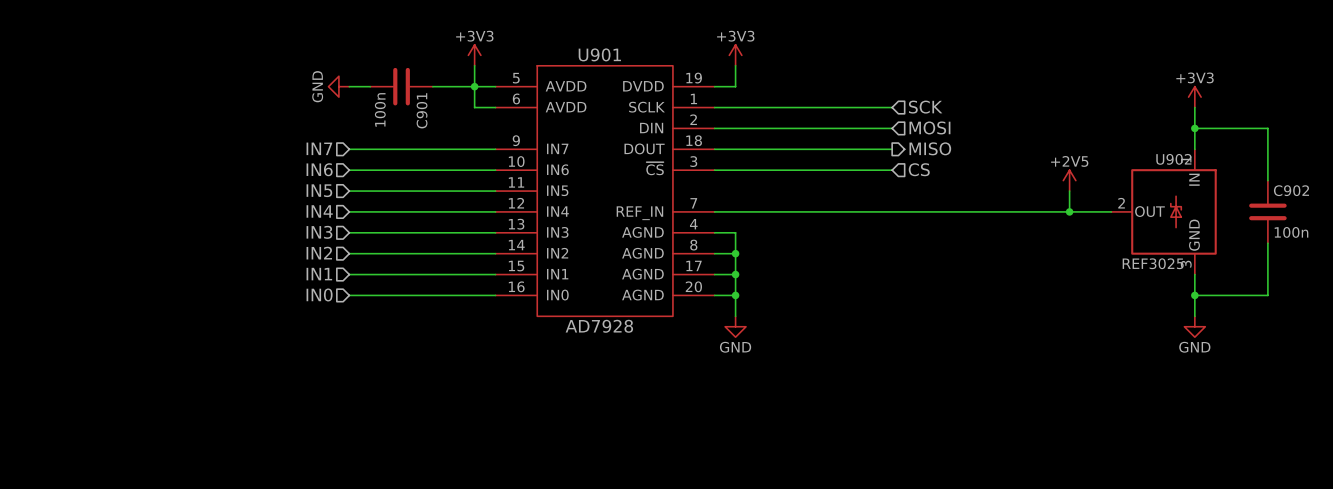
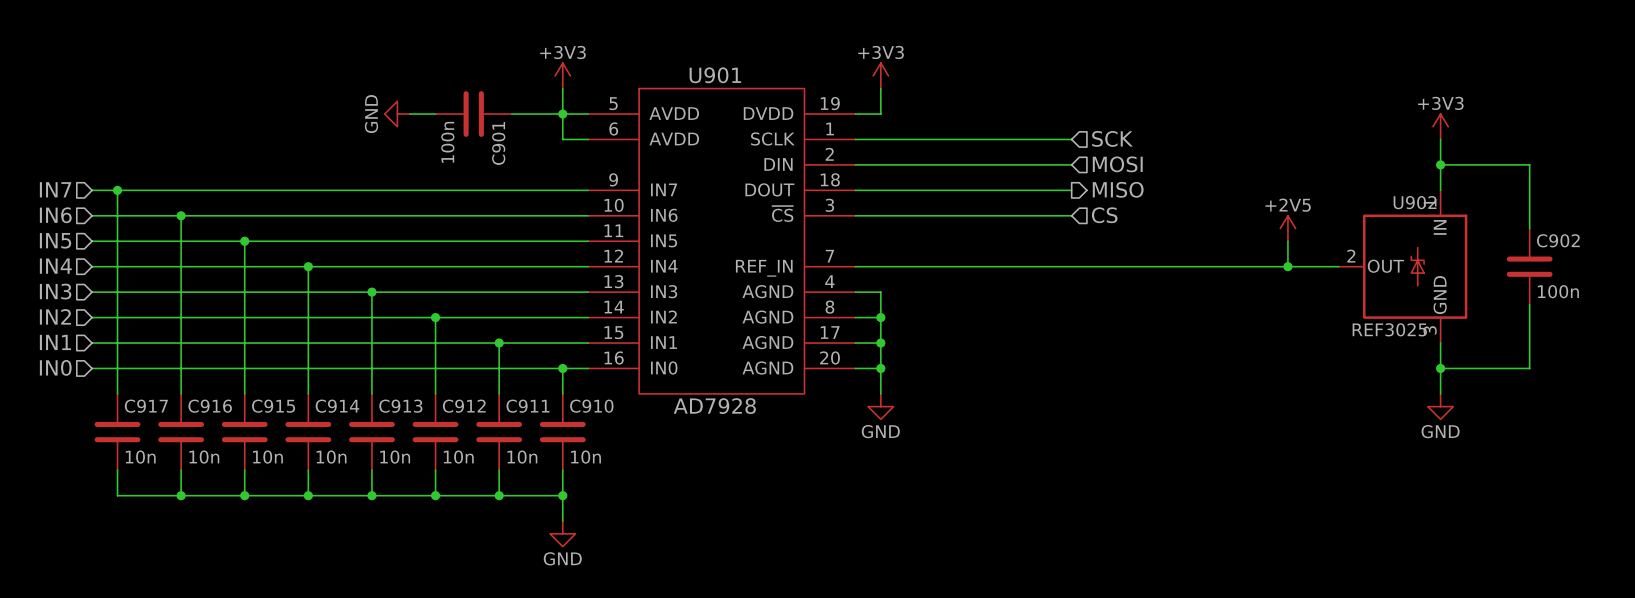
hierarchical label: none -> IN7 (55, 189)
hierarchical label: IN7 (319, 148) -> none
wire: none -> (92, 190) (410, 190)
wire: none -> (117, 190) (117, 393)
junction: none -> (117, 190)
hierarchical label: none -> IN6 (55, 215)
hierarchical label: IN6 (319, 169) -> none
wire: none -> (92, 215) (410, 215)
wire: none -> (181, 215) (181, 393)
junction: none -> (181, 215)
hierarchical label: none -> IN5 (55, 240)
hierarchical label: IN5 (319, 190) -> none
wire: none -> (92, 241) (410, 241)
wire: none -> (244, 241) (244, 393)
junction: none -> (244, 241)
hierarchical label: none -> IN4 (55, 266)
wire: none -> (92, 266) (410, 266)
wire: none -> (308, 266) (308, 393)
junction: none -> (308, 266)
hierarchical label: IN4 (319, 211) -> none
hierarchical label: none -> IN3 (55, 291)
wire: none -> (92, 292) (410, 292)
wire: none -> (371, 292) (371, 393)
junction: none -> (371, 292)
hierarchical label: IN3 (319, 232) -> none
hierarchical label: none -> IN2 (55, 316)
wire: none -> (92, 317) (410, 317)
hierarchical label: IN2 (319, 253) -> none
wire: none -> (435, 317) (435, 393)
junction: none -> (435, 317)
hierarchical label: none -> IN1 (55, 342)
wire: none -> (92, 343) (410, 343)
hierarchical label: IN1 (319, 274) -> none
wire: none -> (499, 343) (499, 393)
junction: none -> (499, 343)
hierarchical label: none -> IN0 (55, 367)
hierarchical label: IN0 (319, 294) -> none
wire: none -> (92, 368) (410, 368)
wire: none -> (562, 368) (562, 393)
junction: none -> (562, 368)
C917: none -> 10n (117, 432)
C916: none -> 10n (181, 432)
C915: none -> 10n (244, 432)
C914: none -> 10n (308, 432)
C913: none -> 10n (371, 432)
C912: none -> 10n (435, 432)
C911: none -> 10n (499, 432)
C910: none -> 10n (562, 432)
wire: none -> (117, 470) (117, 495) (562, 495)
wire: none -> (181, 470) (181, 495)
wire: none -> (244, 470) (244, 495)
wire: none -> (308, 470) (308, 495)
wire: none -> (371, 470) (371, 495)
wire: none -> (435, 470) (435, 495)
wire: none -> (499, 470) (499, 495)
wire: none -> (562, 470) (562, 521)
junction: none -> (181, 495)
junction: none -> (244, 495)
junction: none -> (308, 495)
junction: none -> (371, 495)
junction: none -> (435, 495)
junction: none -> (499, 495)
junction: none -> (562, 495)
power symbol: none -> GND (562, 533)

